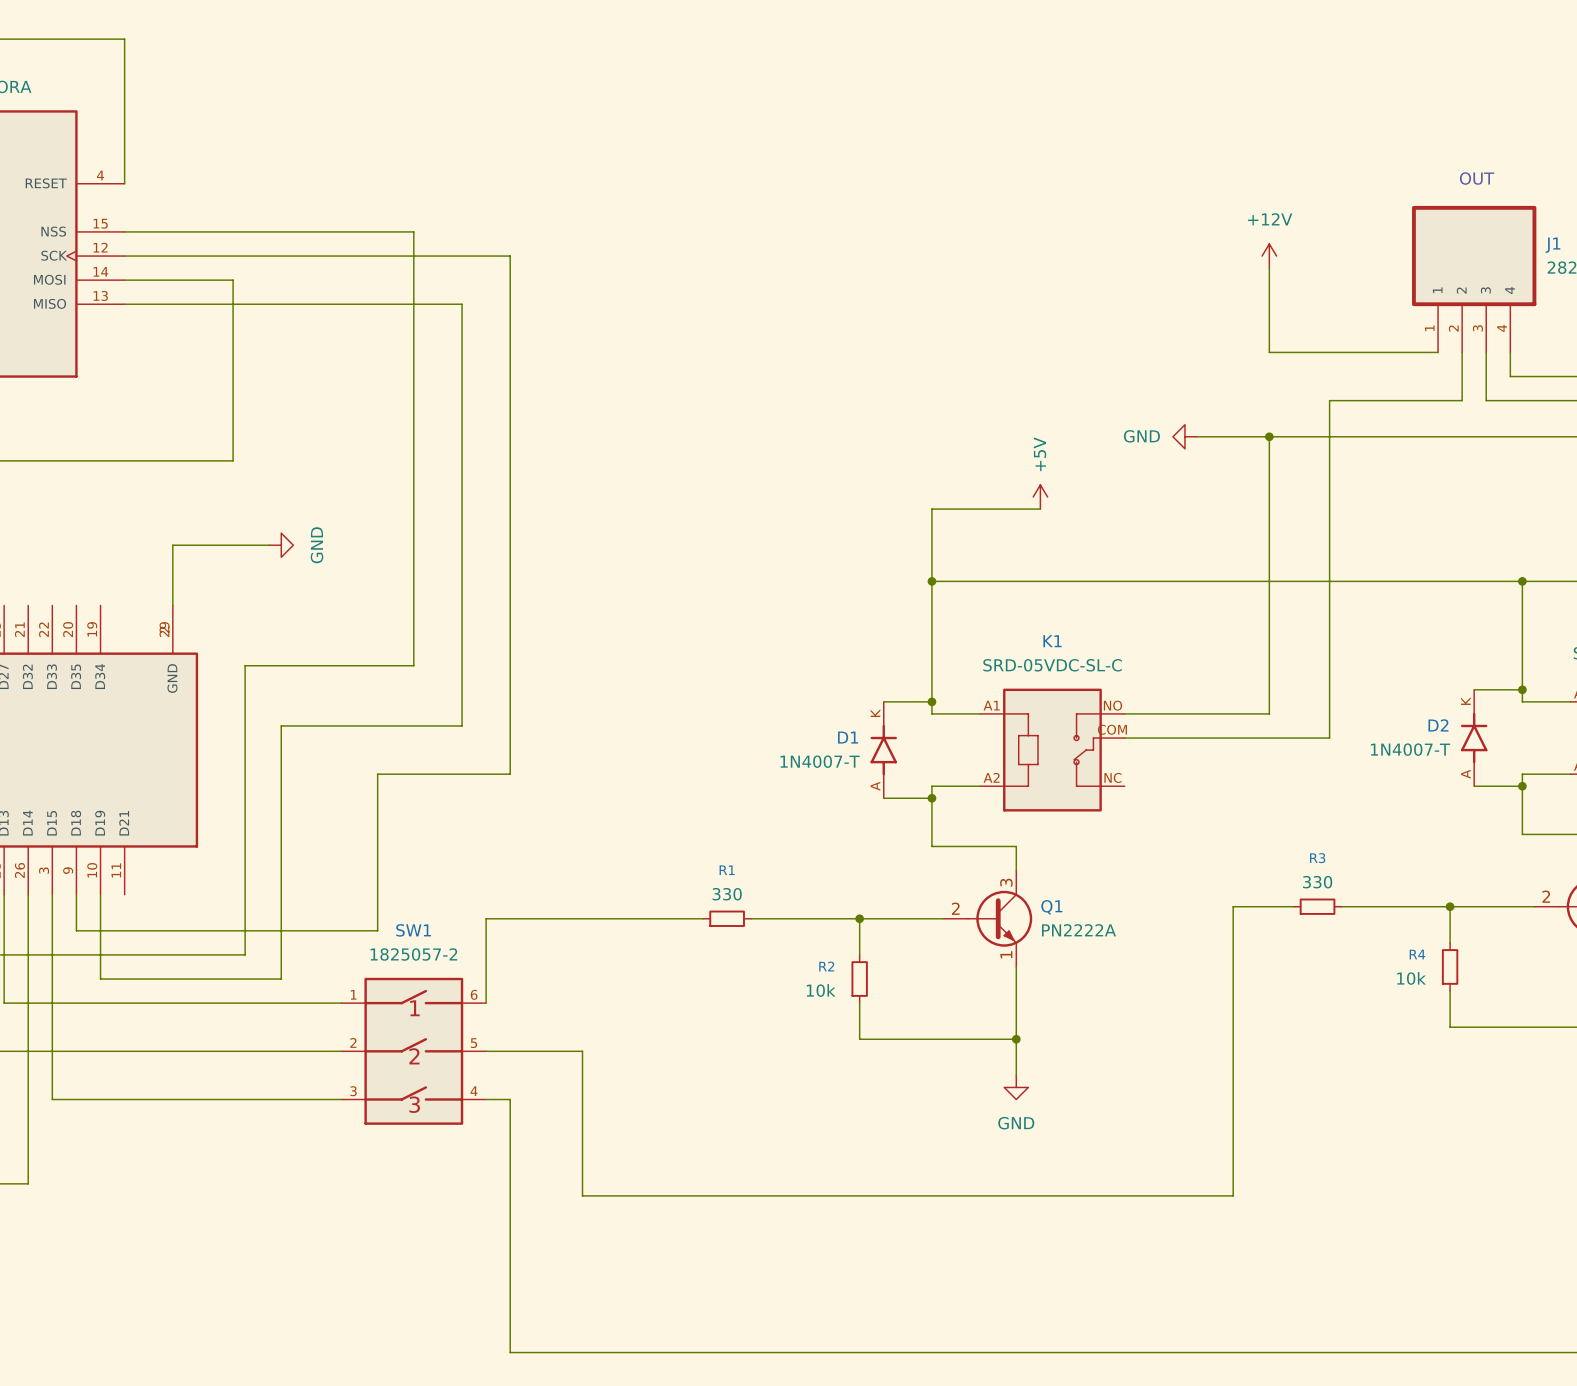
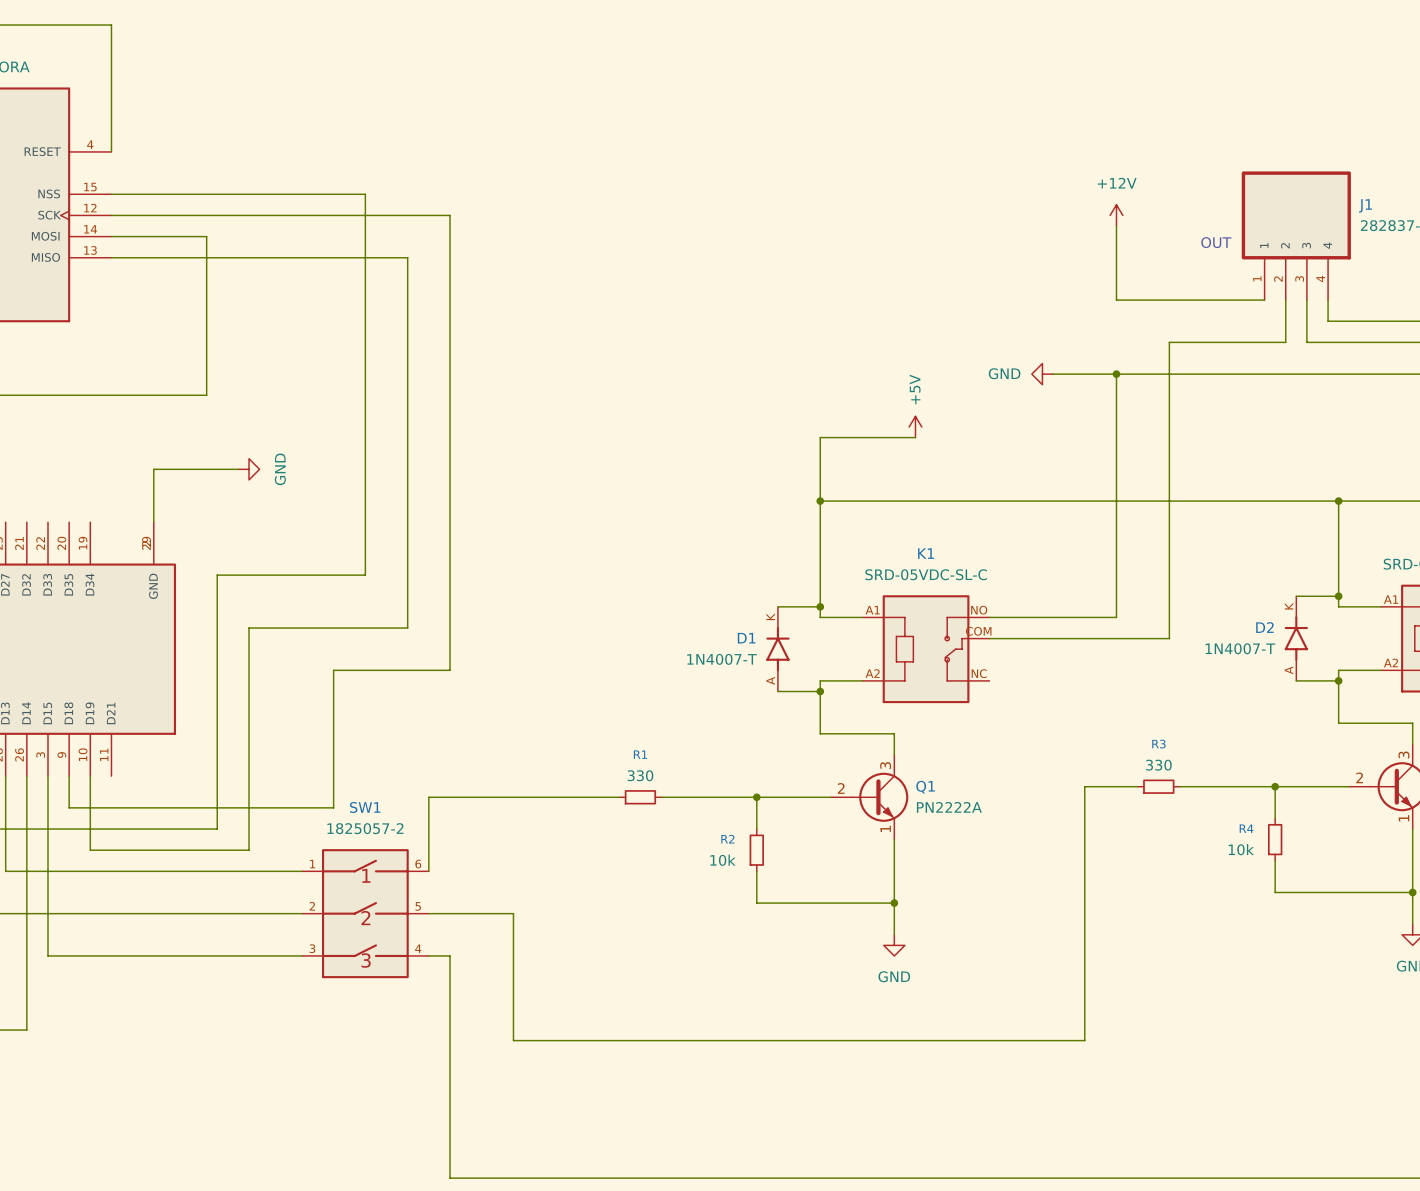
text position: OUT (1477, 178) -> OUT (1216, 242)

